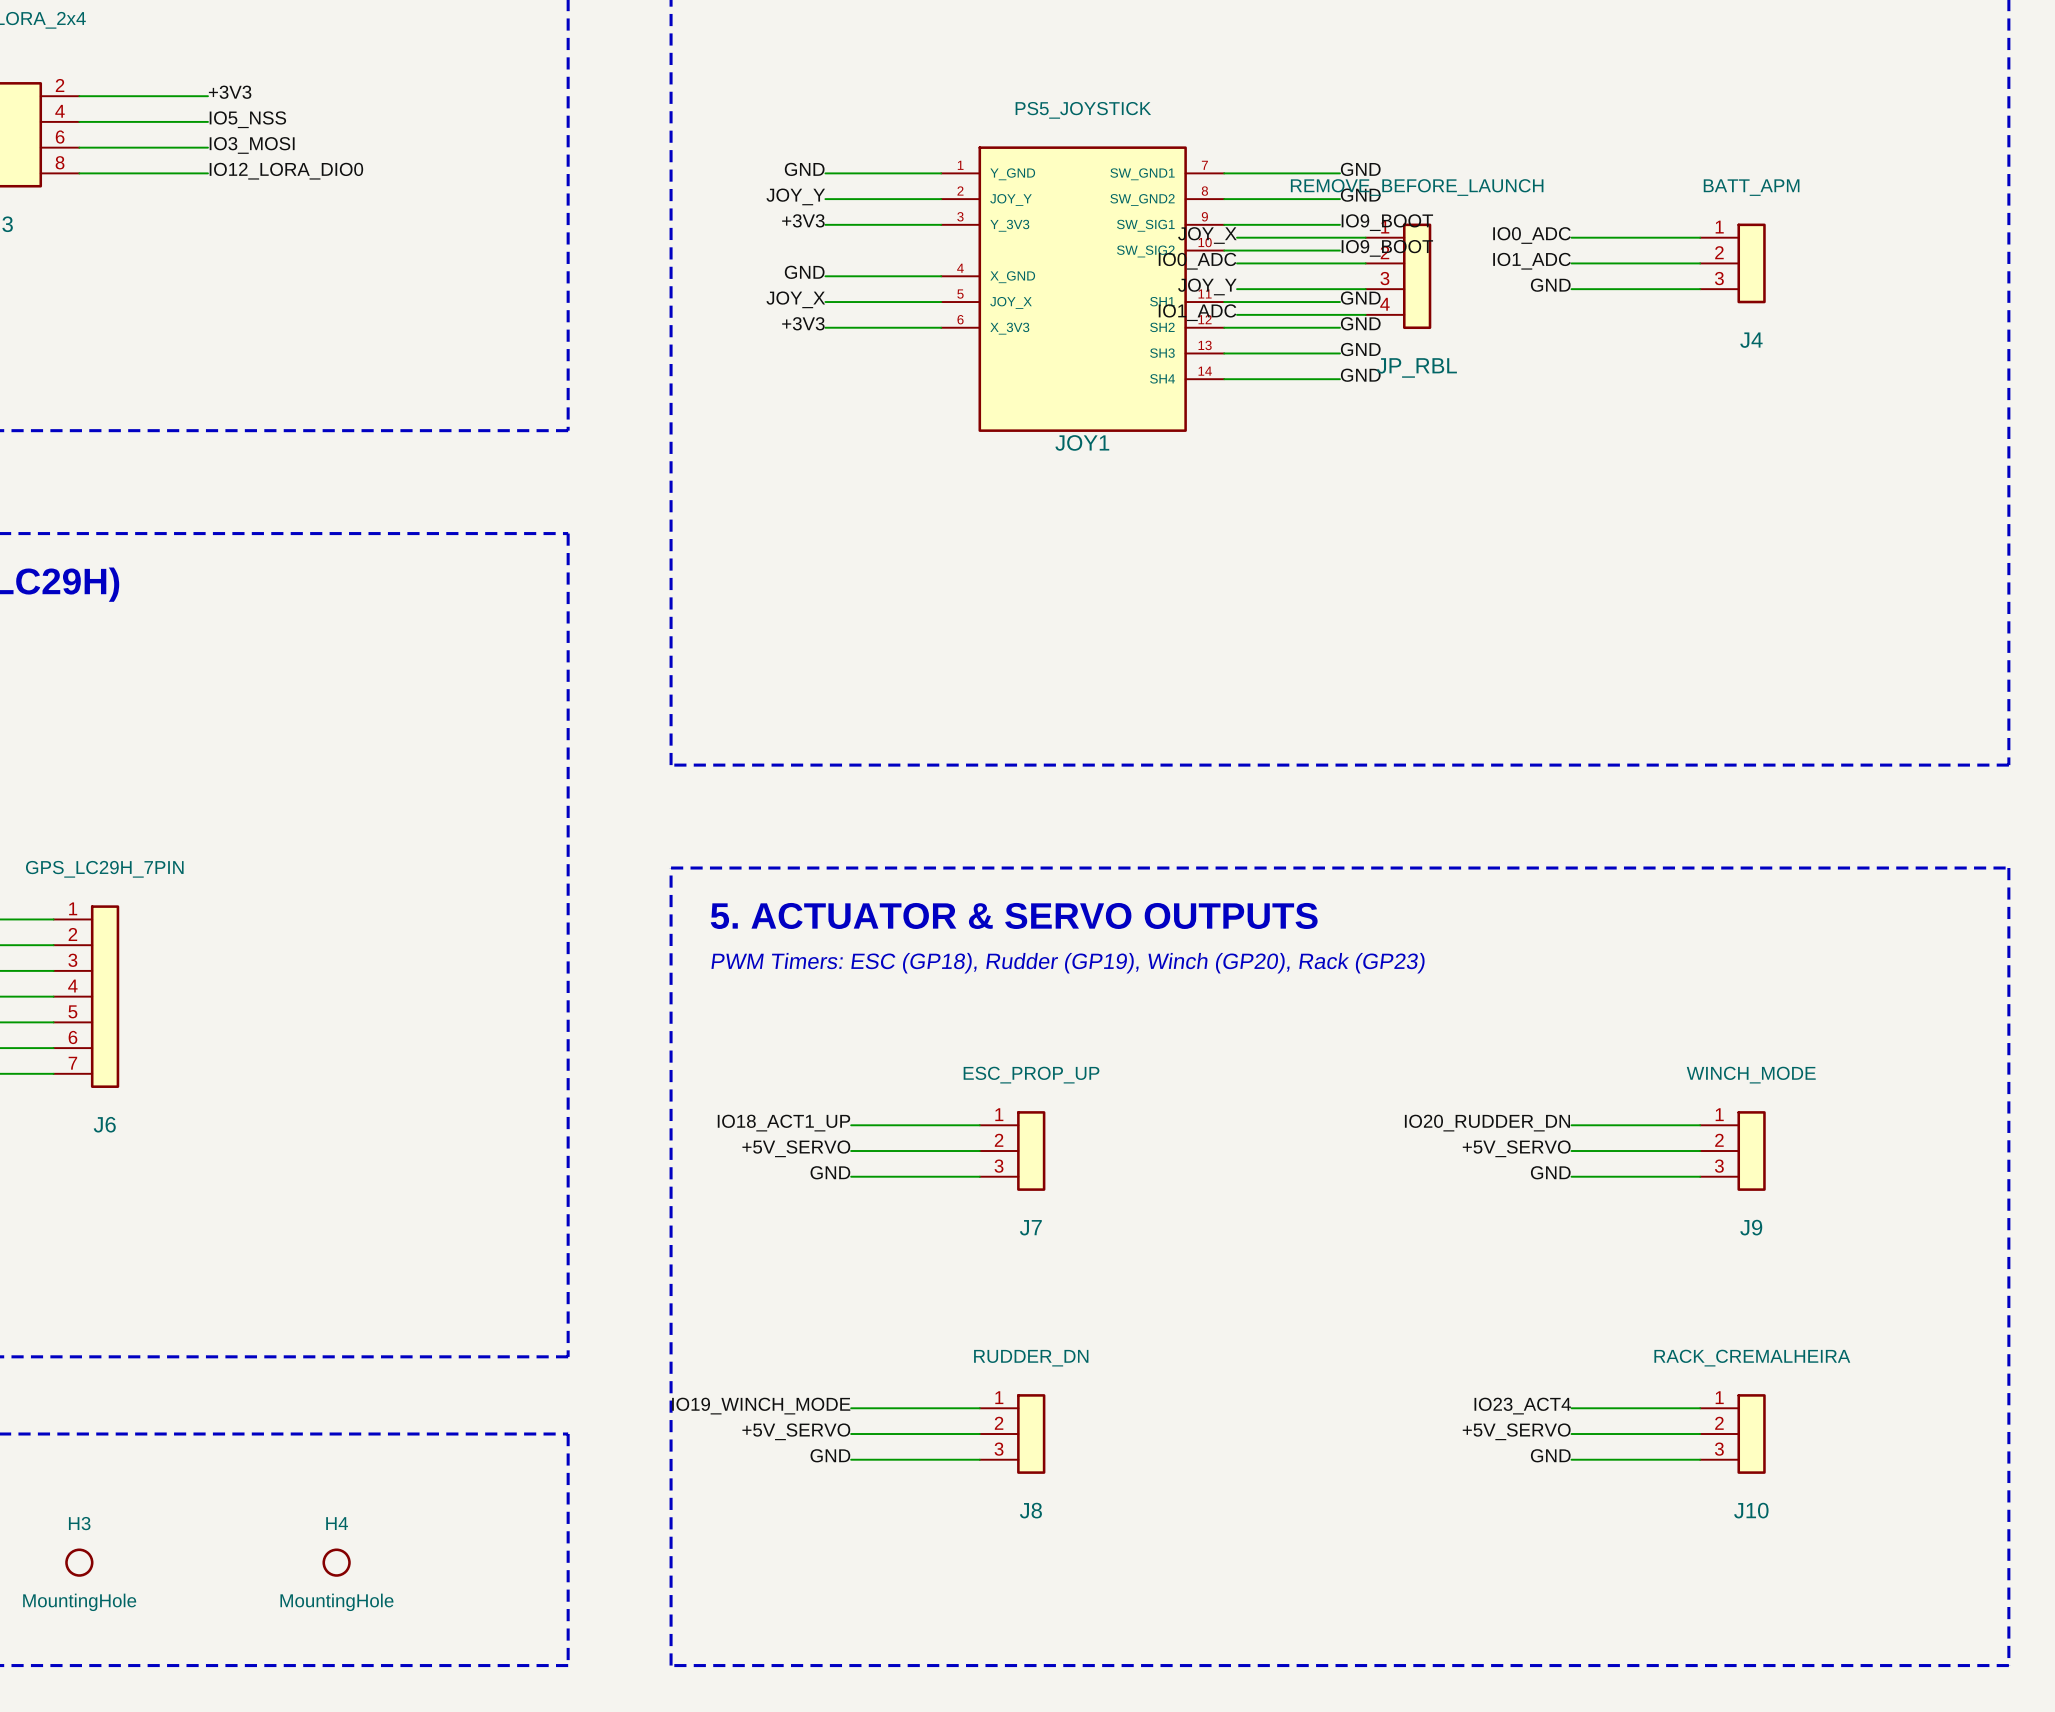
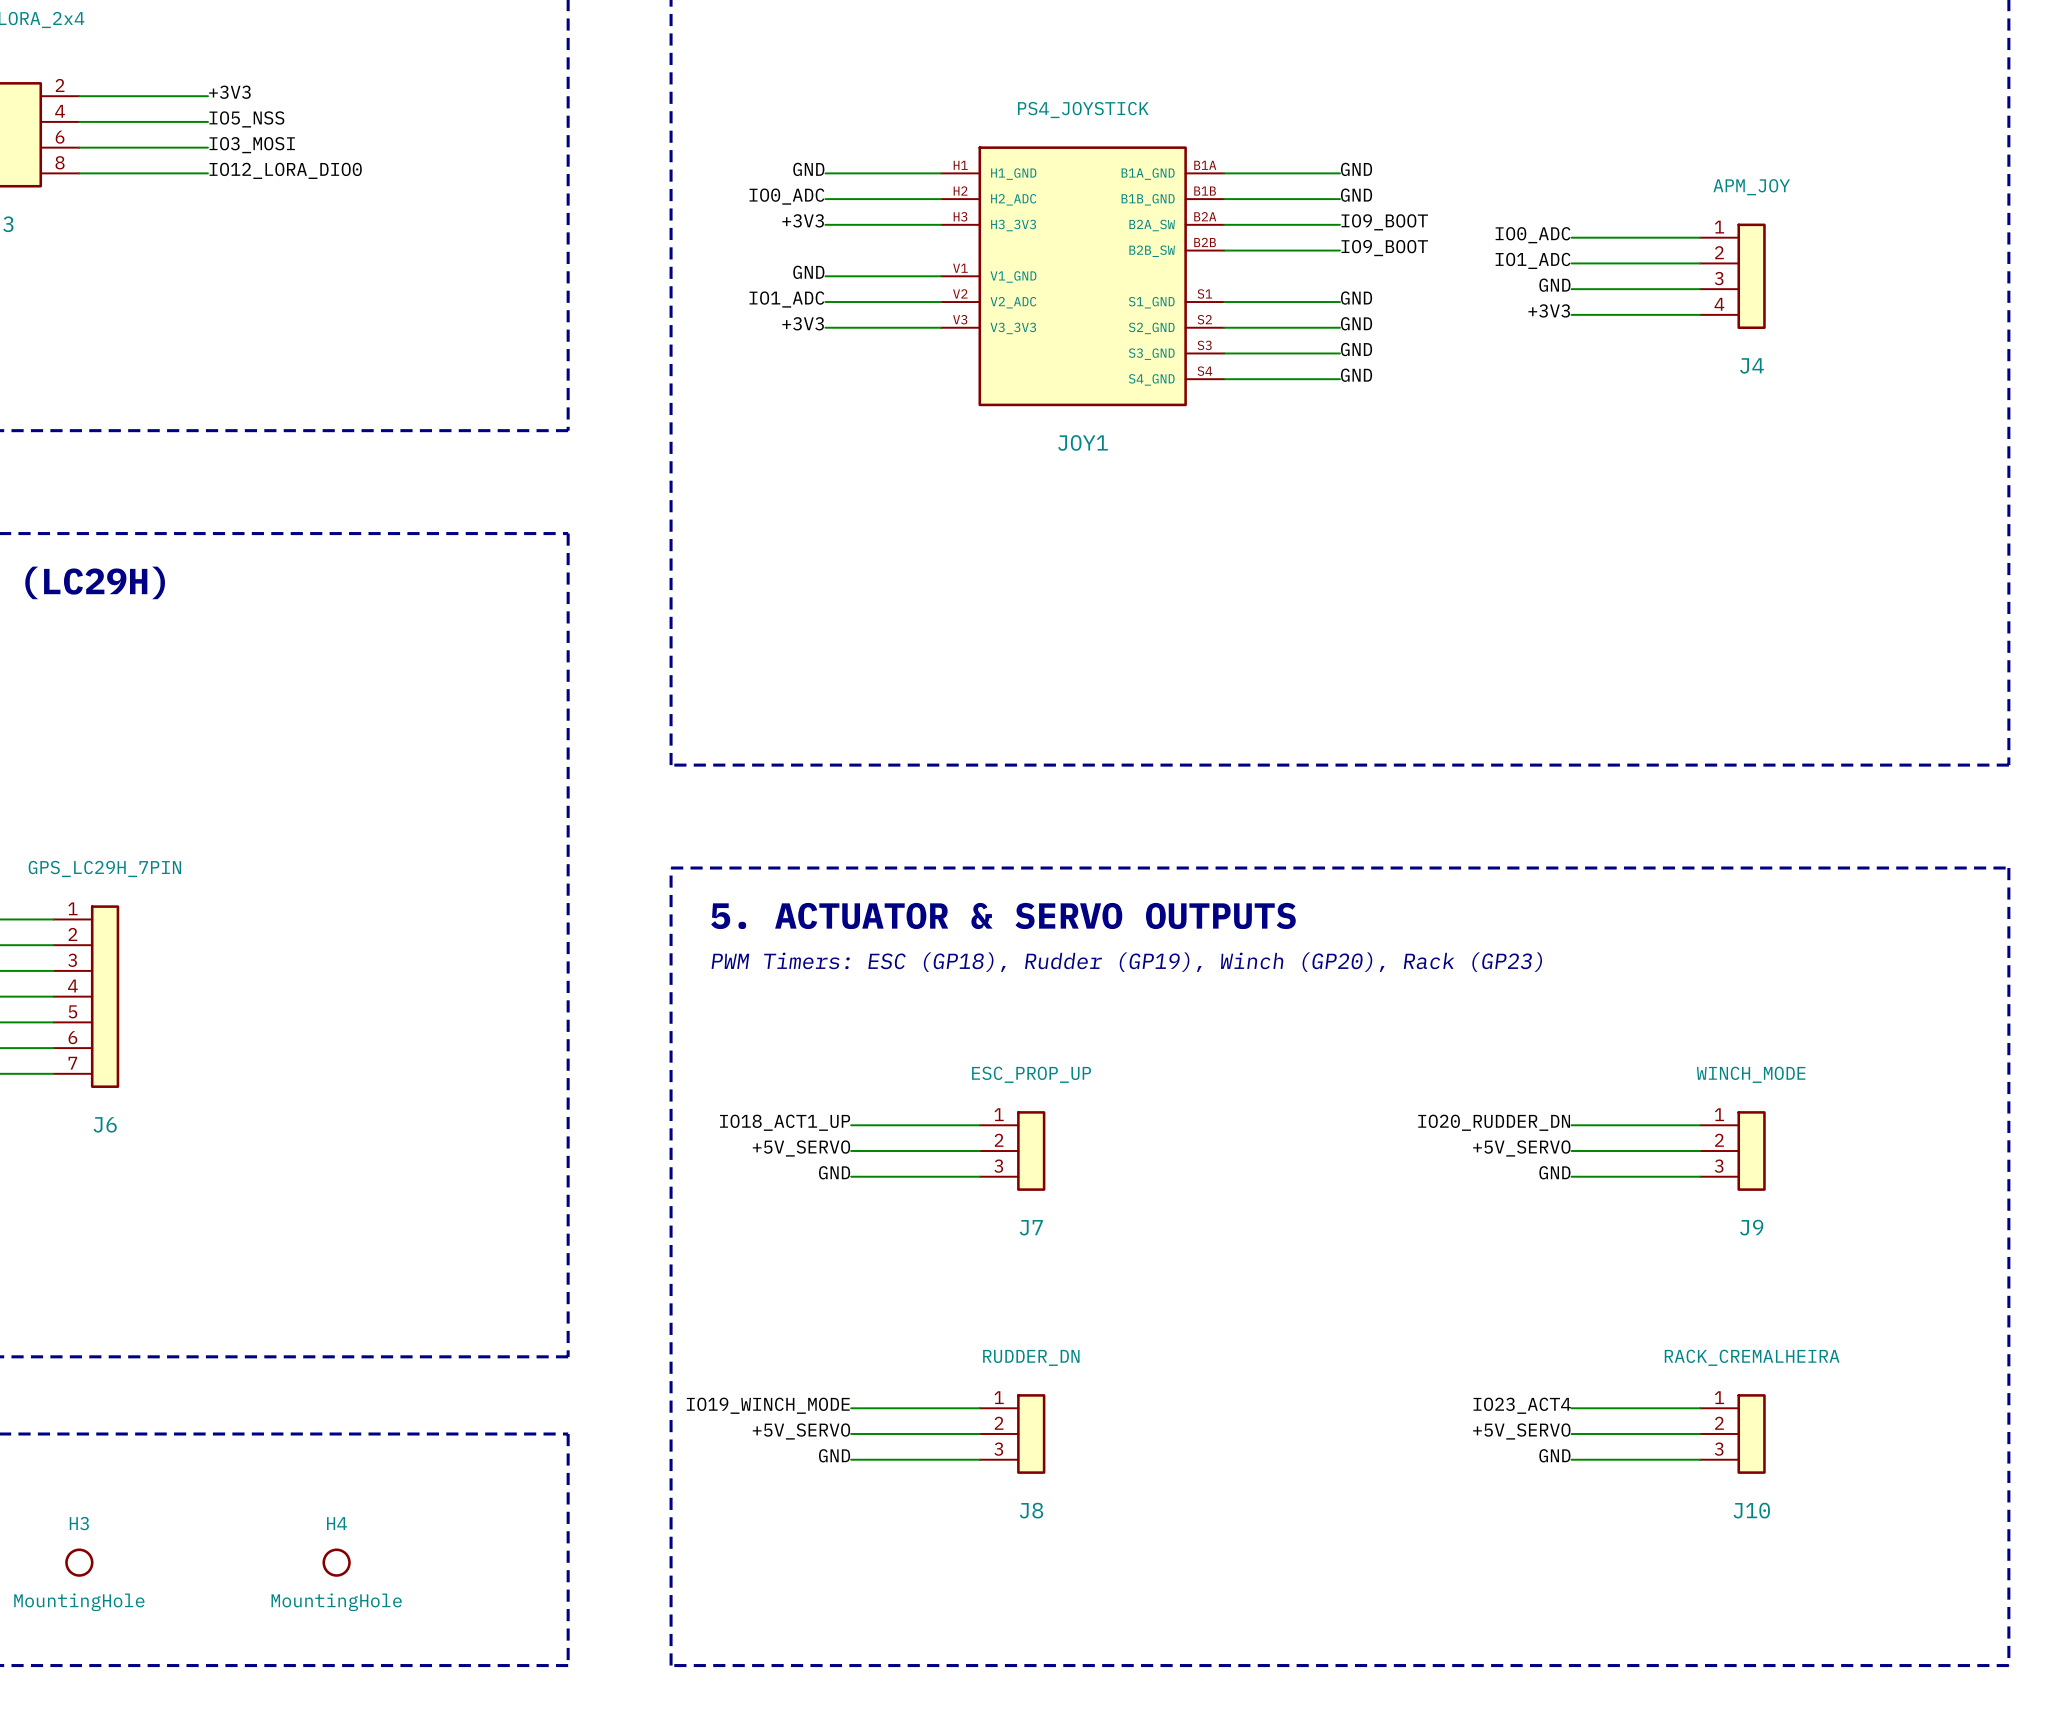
JOY1 value: PS5_JOYSTICK (1083, 110) -> PS4_JOYSTICK (1083, 110)
JOY1 symbol: [941, 146, 1225, 432] -> [941, 146, 1225, 407]
J4 value: BATT_APM (1751, 187) -> APM_JOY (1751, 187)
label: JOY_Y (795, 196) -> IO0_ADC (786, 196)
J4 symbol: [1700, 223, 1766, 304] -> [1700, 223, 1766, 330]
label: JOY_X (1207, 235) -> none
wire: (1237, 237) (1365, 237) -> none
label: IO0_ADC (1197, 261) -> none
wire: (1237, 263) (1365, 263) -> none
JP_RBL: REMOVE_BEFORE_LAUNCH (1398, 276) -> none
label: JOY_Y (1207, 286) -> none
wire: (1237, 289) (1365, 289) -> none
label: JOY_X (795, 299) -> IO1_ADC (786, 299)
label: none -> +3V3 (1549, 310)
label: IO1_ADC (1197, 312) -> none
wire: (1237, 314) (1365, 314) -> none
wire: none -> (1571, 314) (1700, 314)

